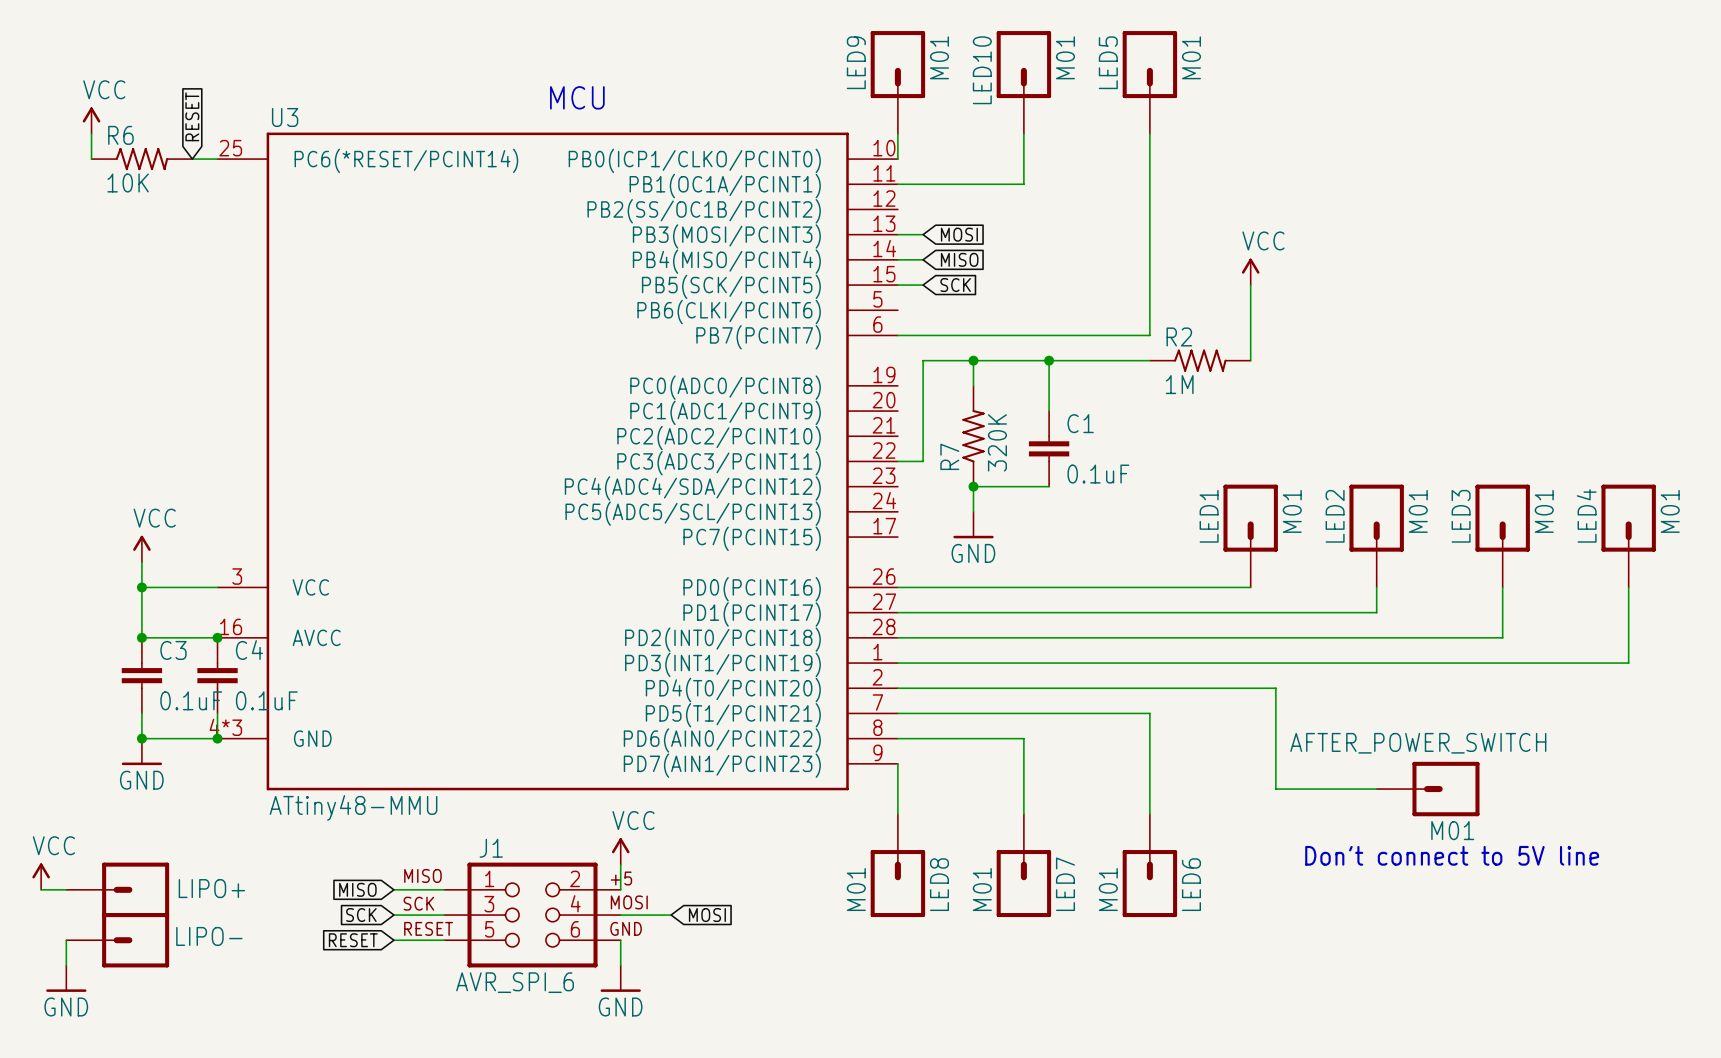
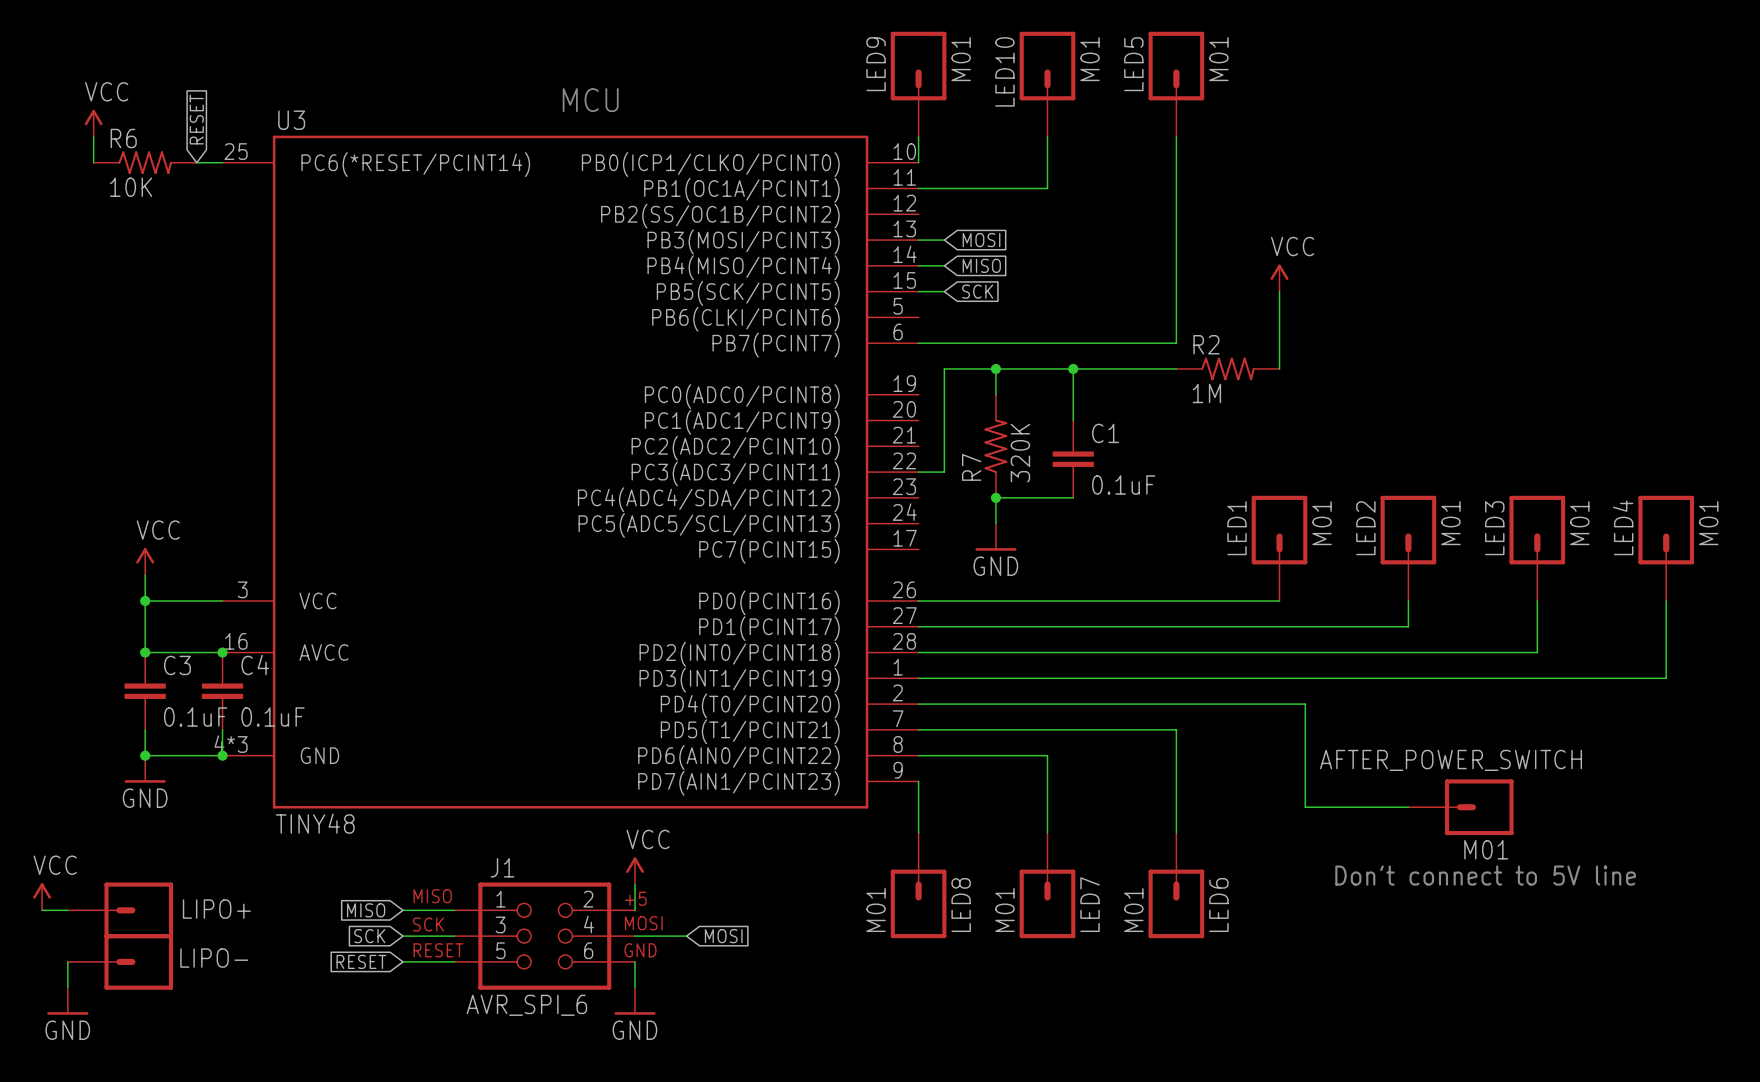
U3 value: ATtiny48-MMU (353, 807) -> TINY48 (315, 823)

